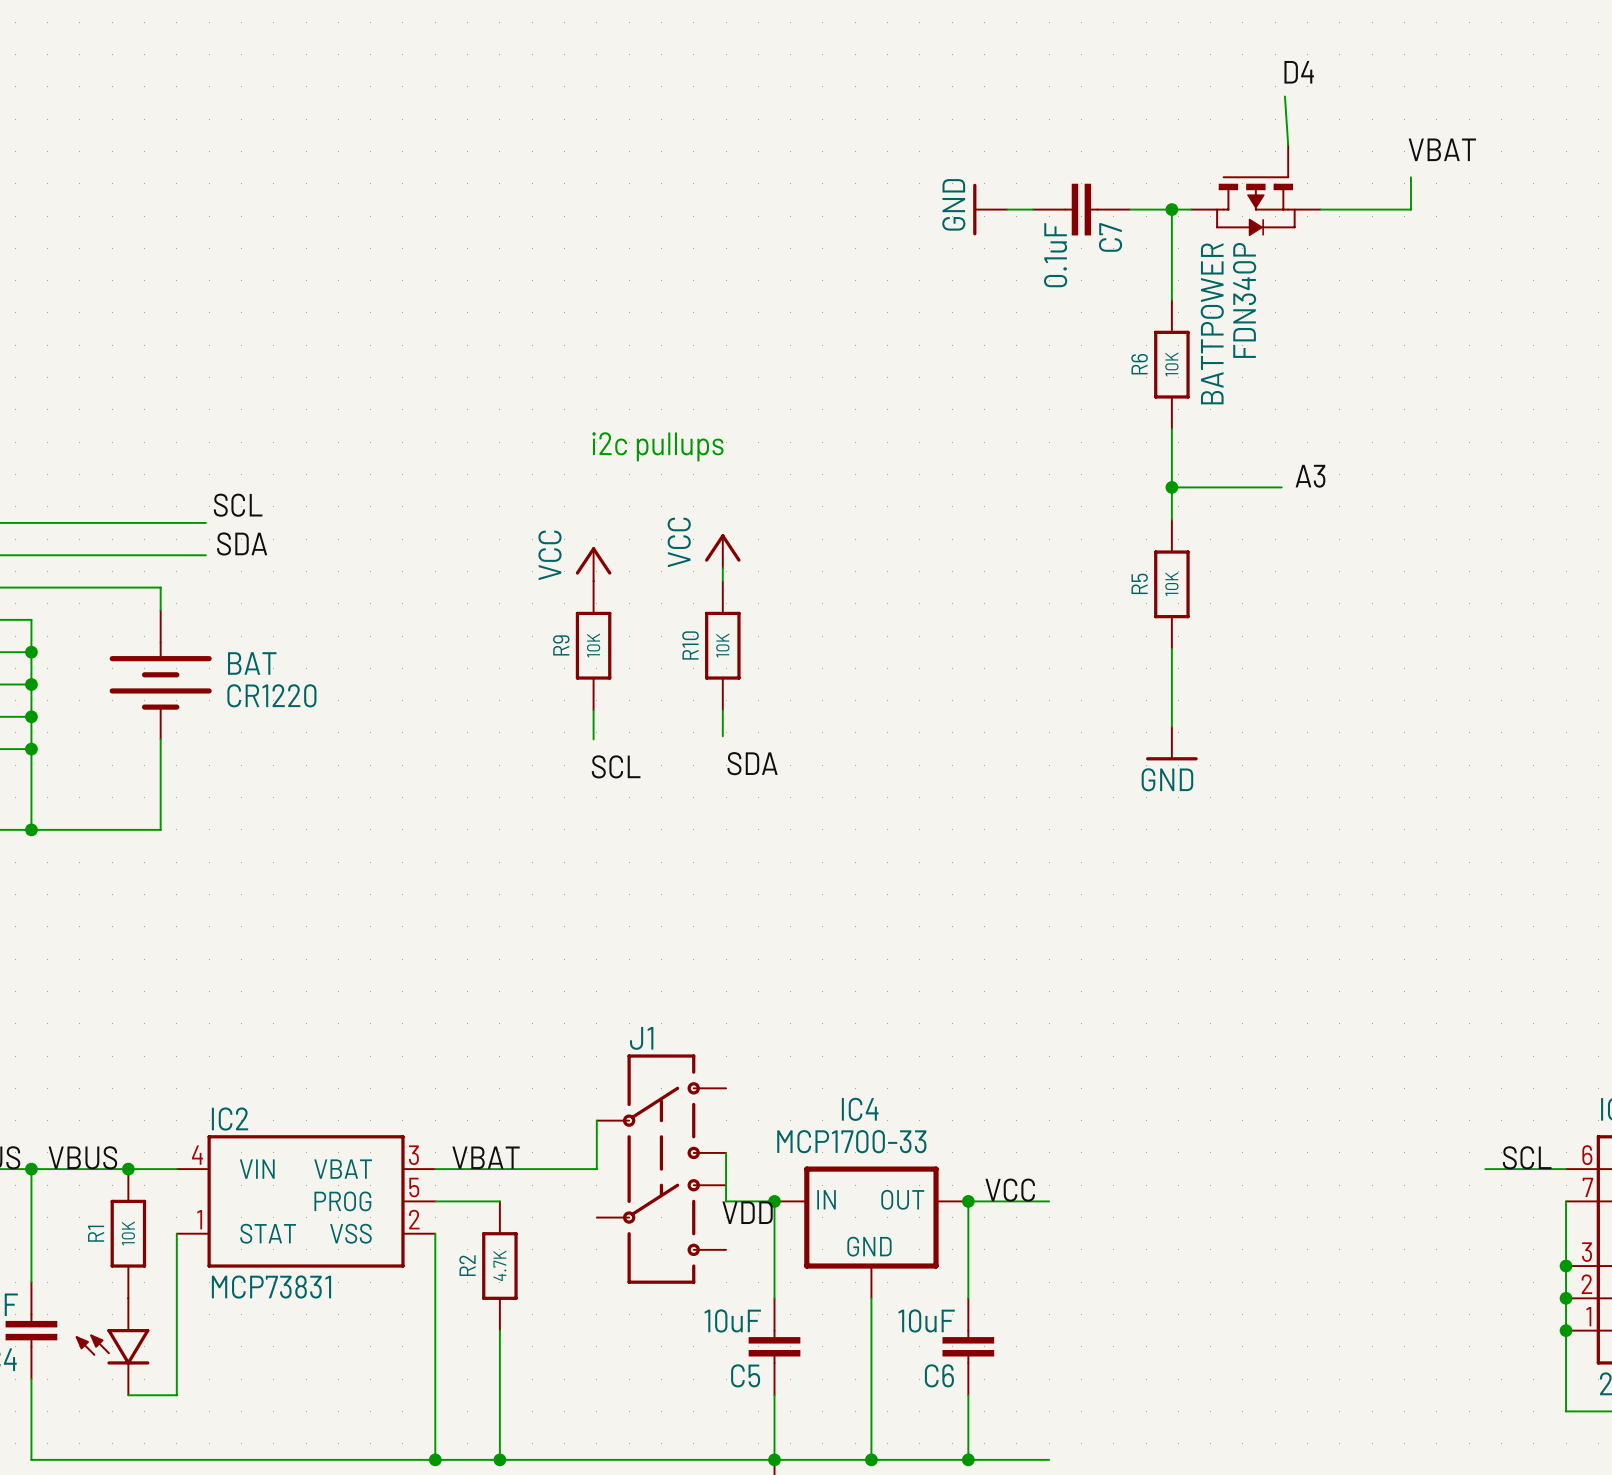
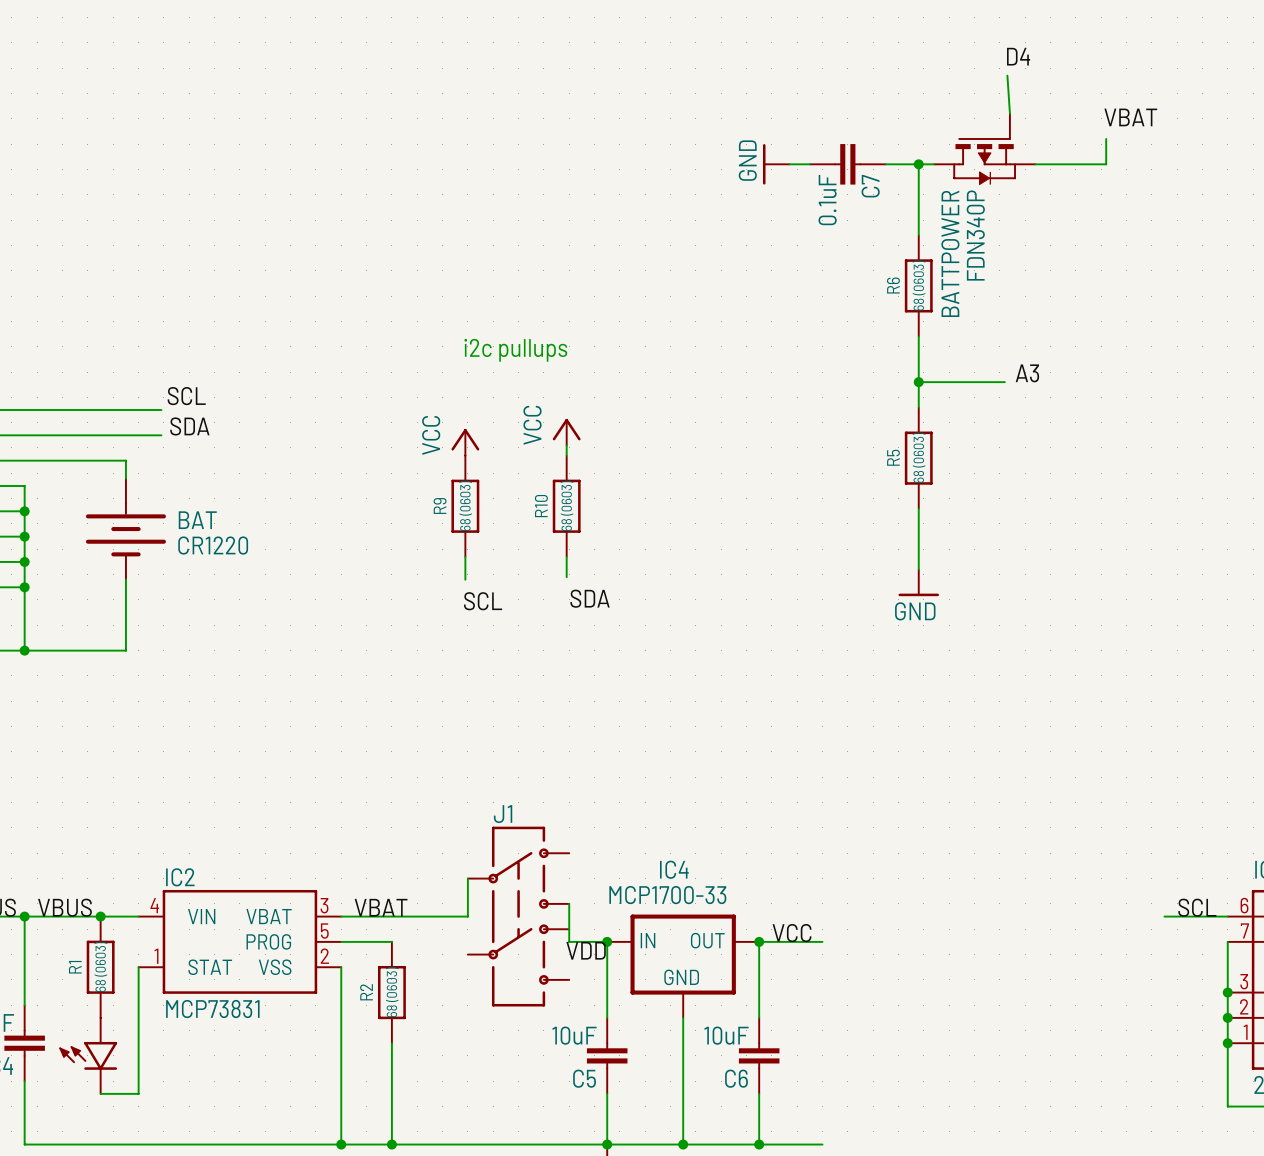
R6 value: 10K (1171, 364) -> 68 (0603) (919, 285)
R5 value: 10K (1171, 584) -> 68 (0603) (919, 457)
R9 value: 10K (593, 645) -> 68 (0603) (465, 505)
R10 value: 10K (722, 645) -> 68 (0603) (566, 505)
R1 value: 10K (128, 1233) -> 68 (0603) (100, 966)
R2 value: 4.7K (499, 1265) -> 68 (0603) (392, 992)

